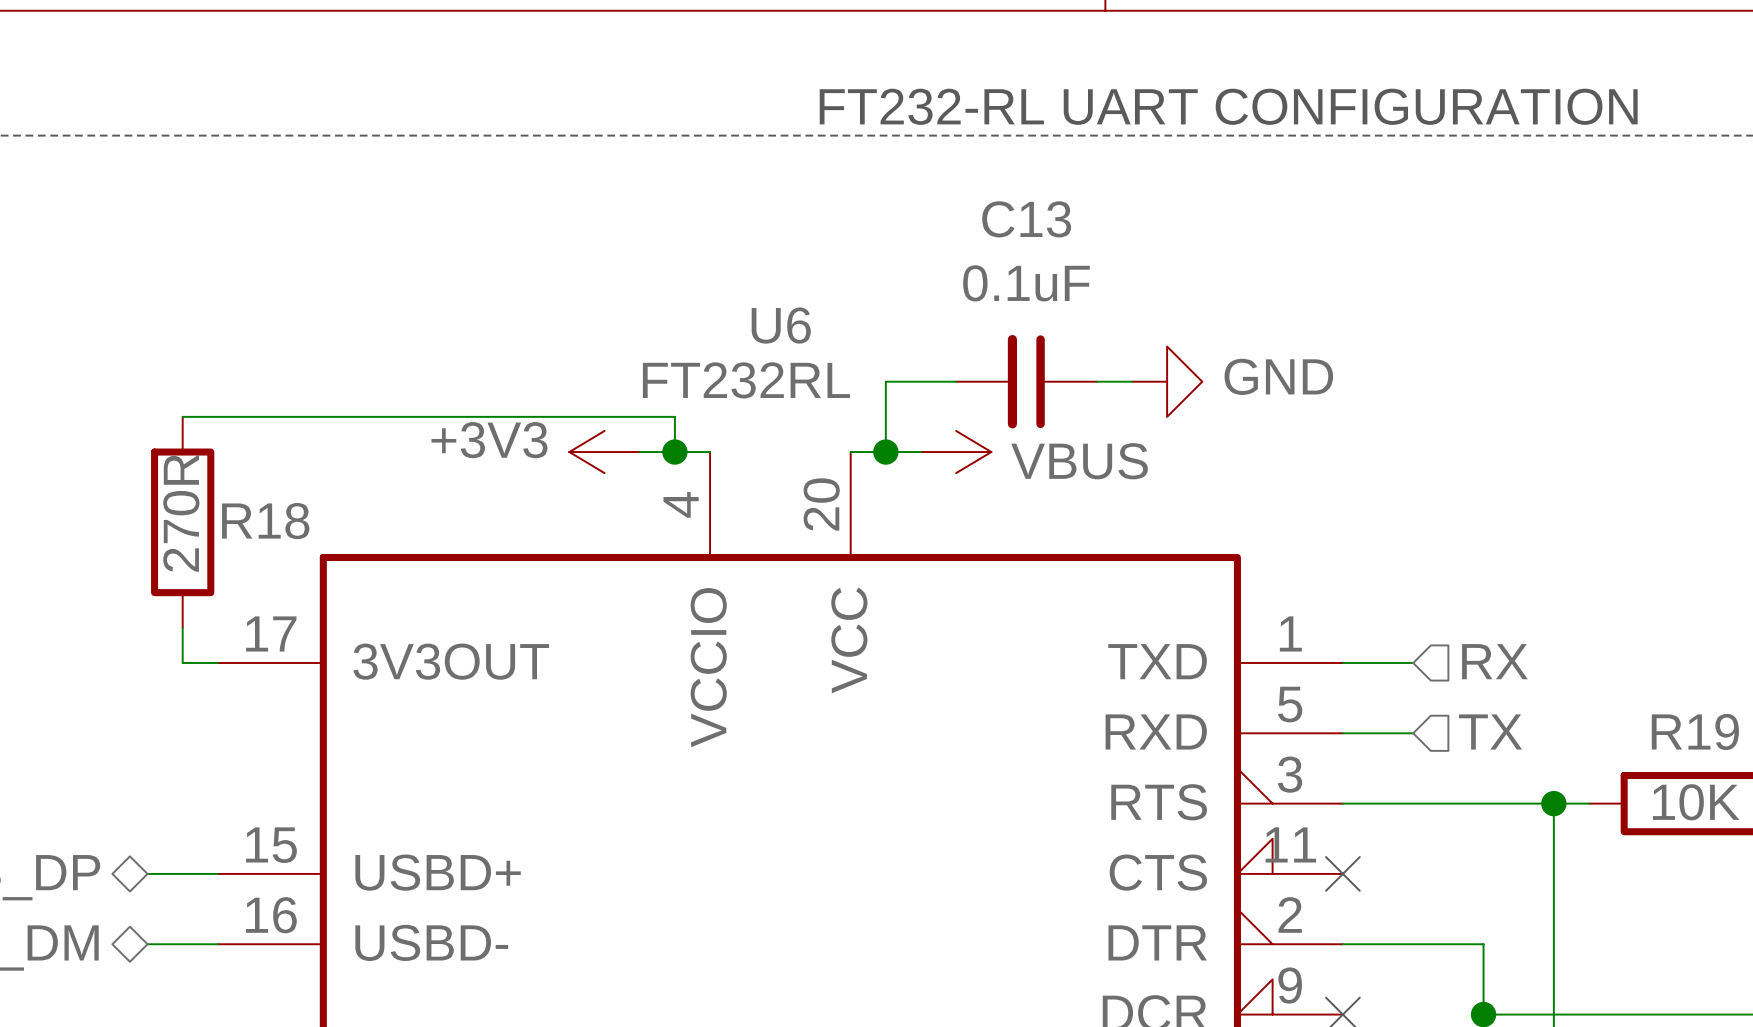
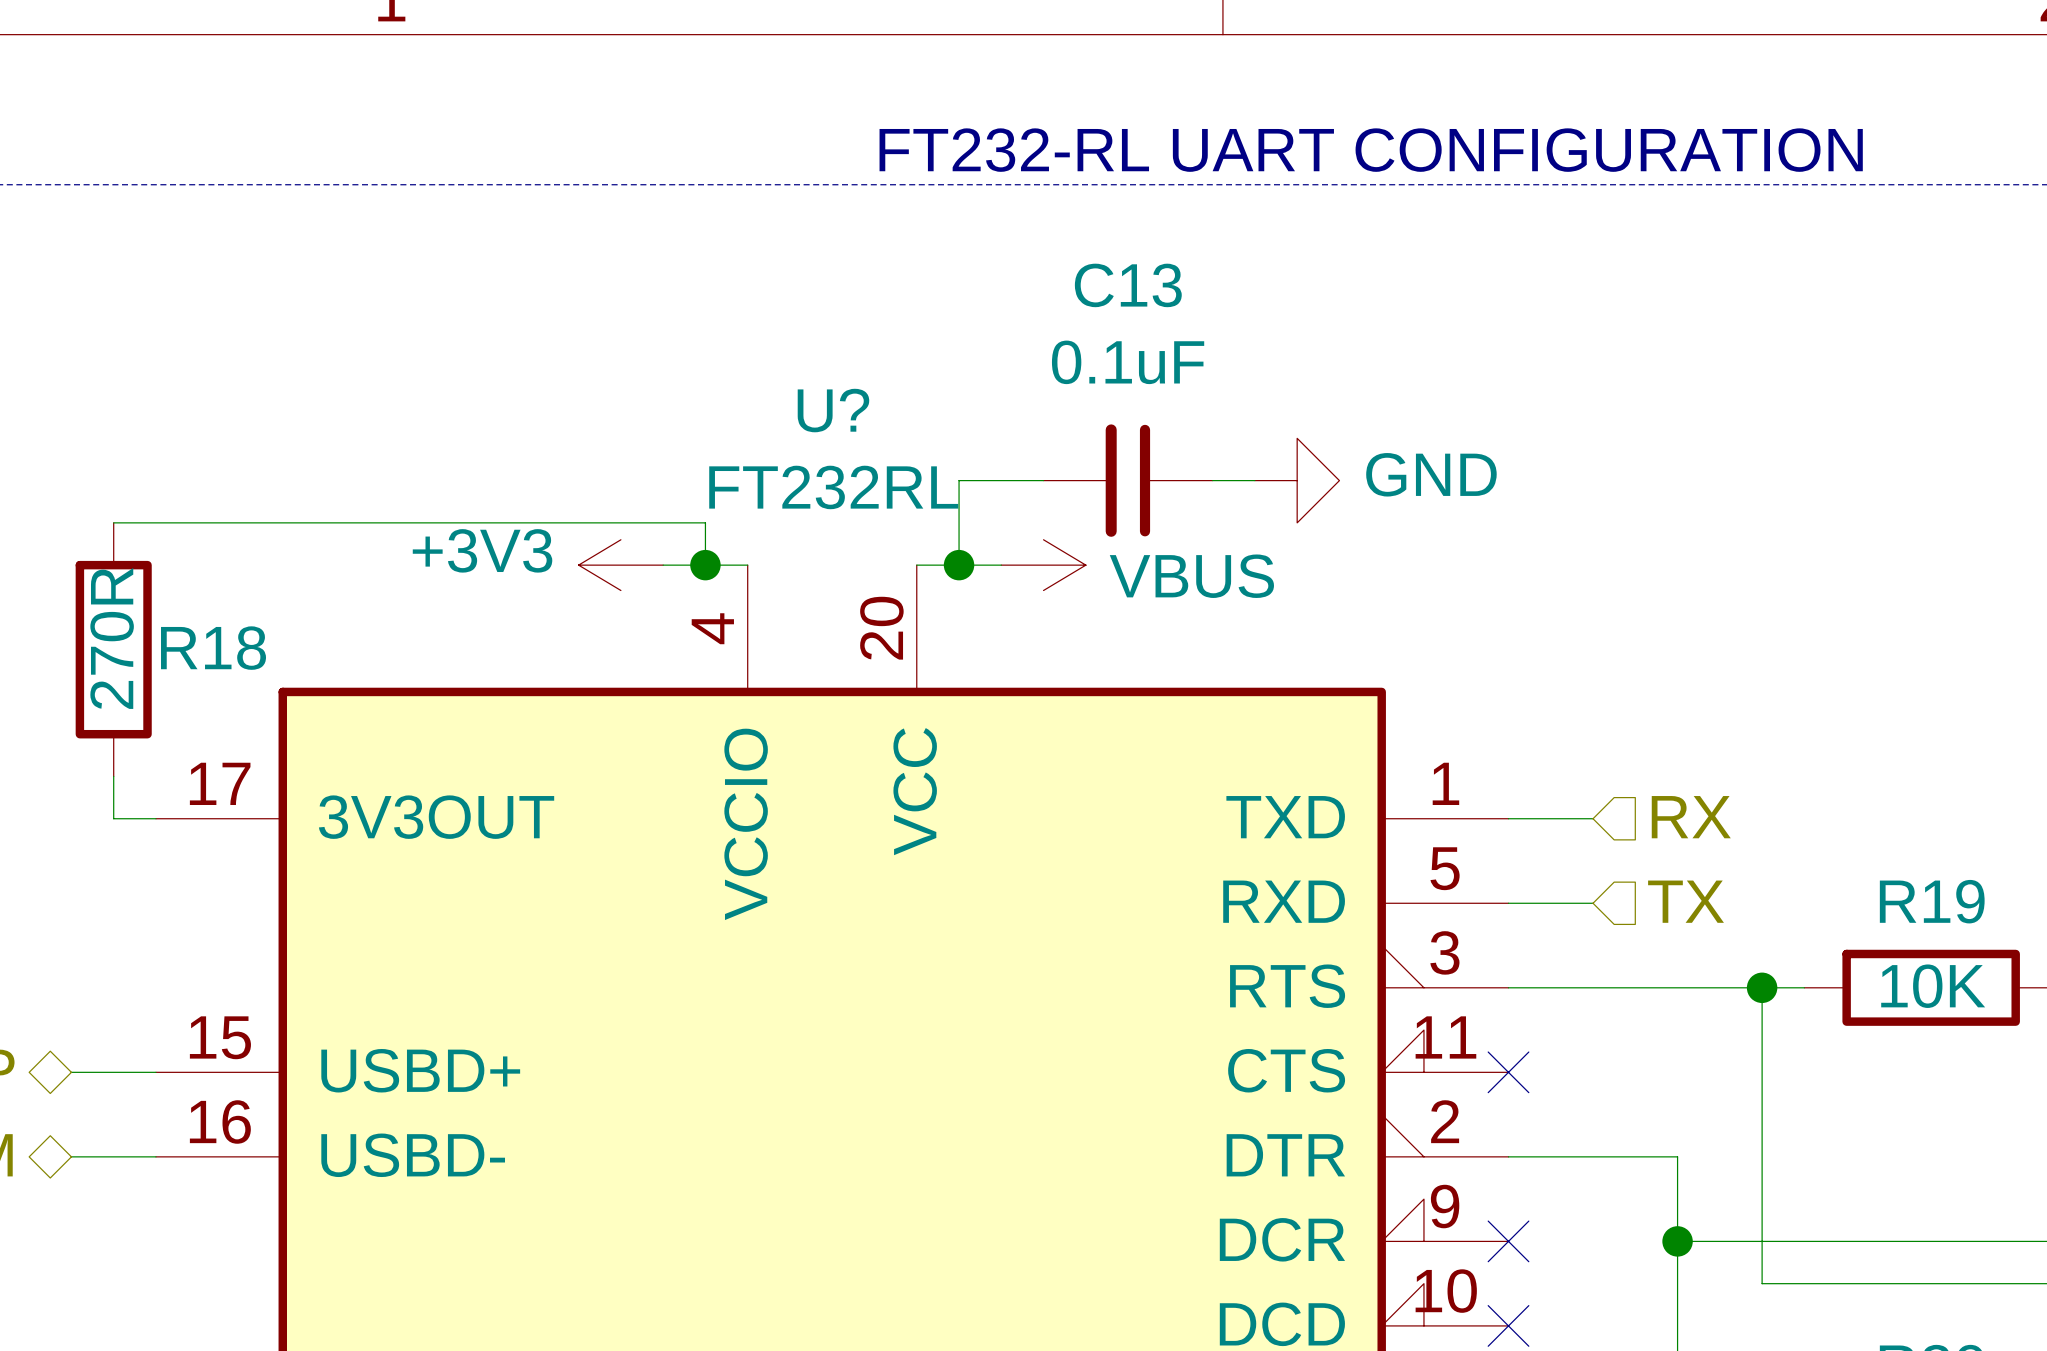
U6 name: U6 (781, 325) -> U? (833, 410)
U6 value position: FT232RL (746, 380) -> FT232RL (833, 487)

